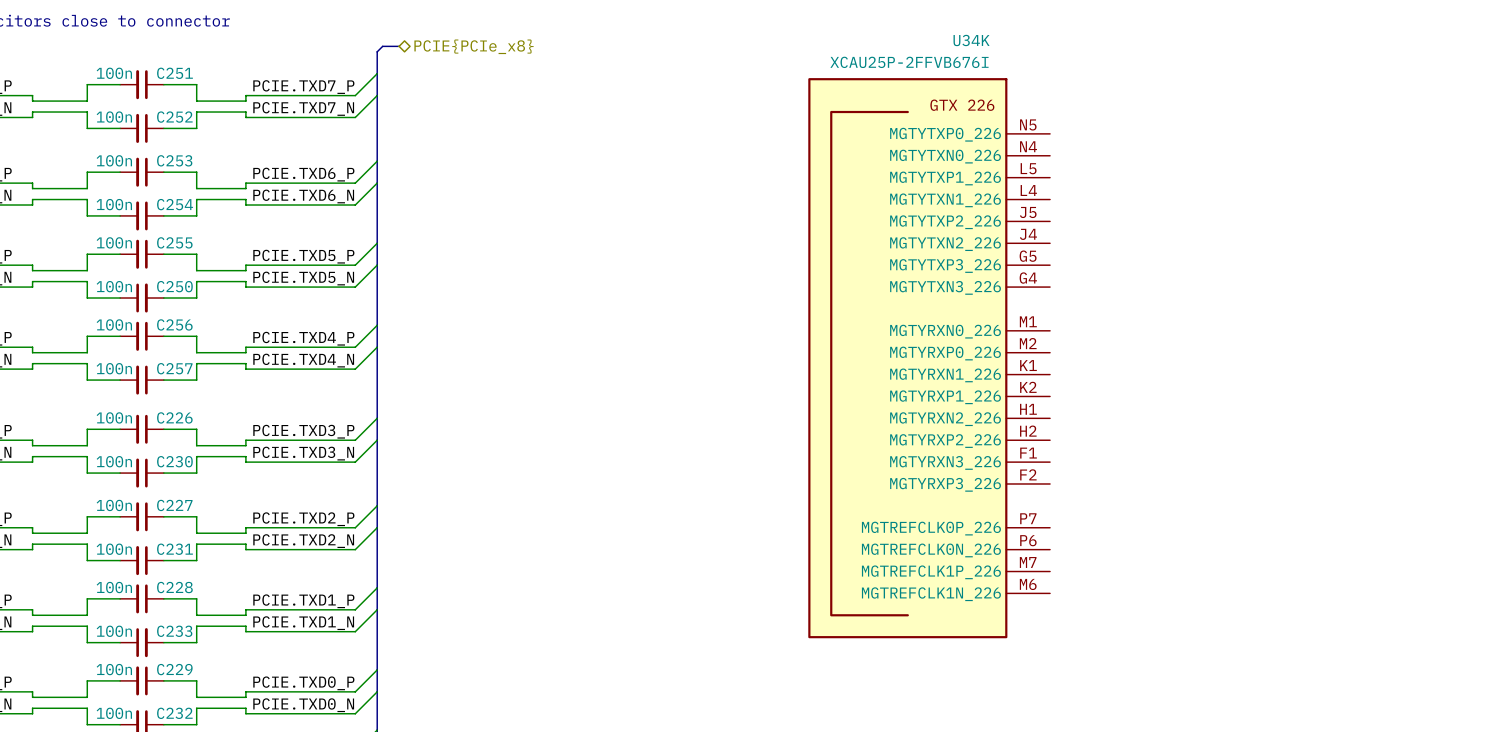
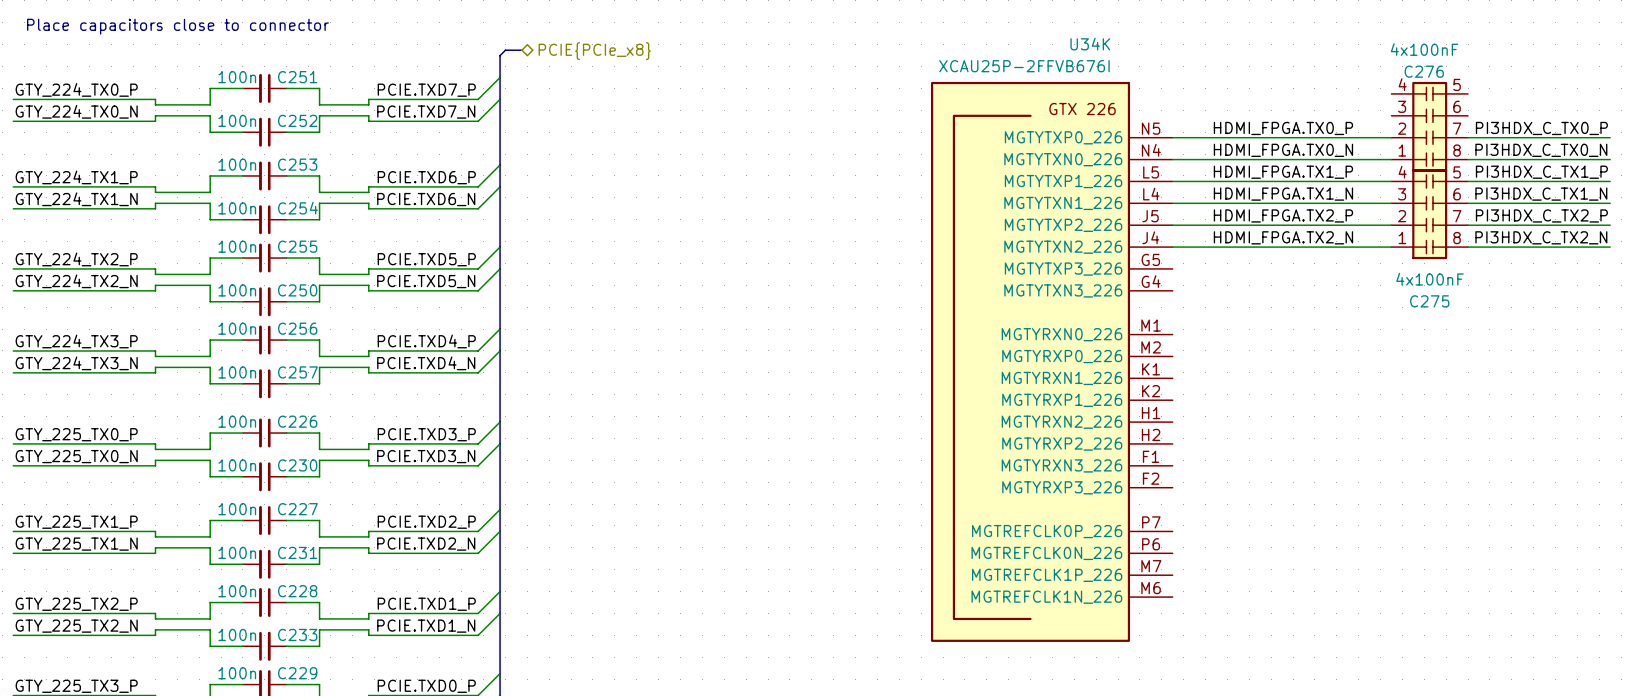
C276: none -> (1429, 126)
label: none -> HDMI_FPGA.TX0_P (1283, 128)
label: none -> PI3HDX_C_TX0_P (1541, 128)
wire: none -> (1172, 137) (1391, 137)
wire: none -> (1468, 137) (1610, 137)
label: none -> HDMI_FPGA.TX0_N (1283, 150)
label: none -> PI3HDX_C_TX0_N (1541, 150)
wire: none -> (1172, 159) (1391, 159)
wire: none -> (1468, 159) (1610, 159)
label: none -> HDMI_FPGA.TX1_P (1283, 172)
label: none -> PI3HDX_C_TX1_P (1541, 172)
wire: none -> (1172, 181) (1391, 181)
wire: none -> (1468, 181) (1610, 181)
label: none -> HDMI_FPGA.TX1_N (1283, 194)
label: none -> PI3HDX_C_TX1_N (1541, 194)
wire: none -> (1172, 203) (1391, 203)
wire: none -> (1468, 203) (1610, 203)
C275: none -> (1429, 214)
label: none -> HDMI_FPGA.TX2_P (1283, 215)
label: none -> PI3HDX_C_TX2_P (1541, 215)
wire: none -> (1172, 225) (1391, 225)
wire: none -> (1468, 225) (1610, 225)
label: none -> HDMI_FPGA.TX2_N (1283, 237)
label: none -> PI3HDX_C_TX2_N (1541, 237)
wire: none -> (1172, 247) (1391, 247)
wire: none -> (1468, 247) (1610, 247)

